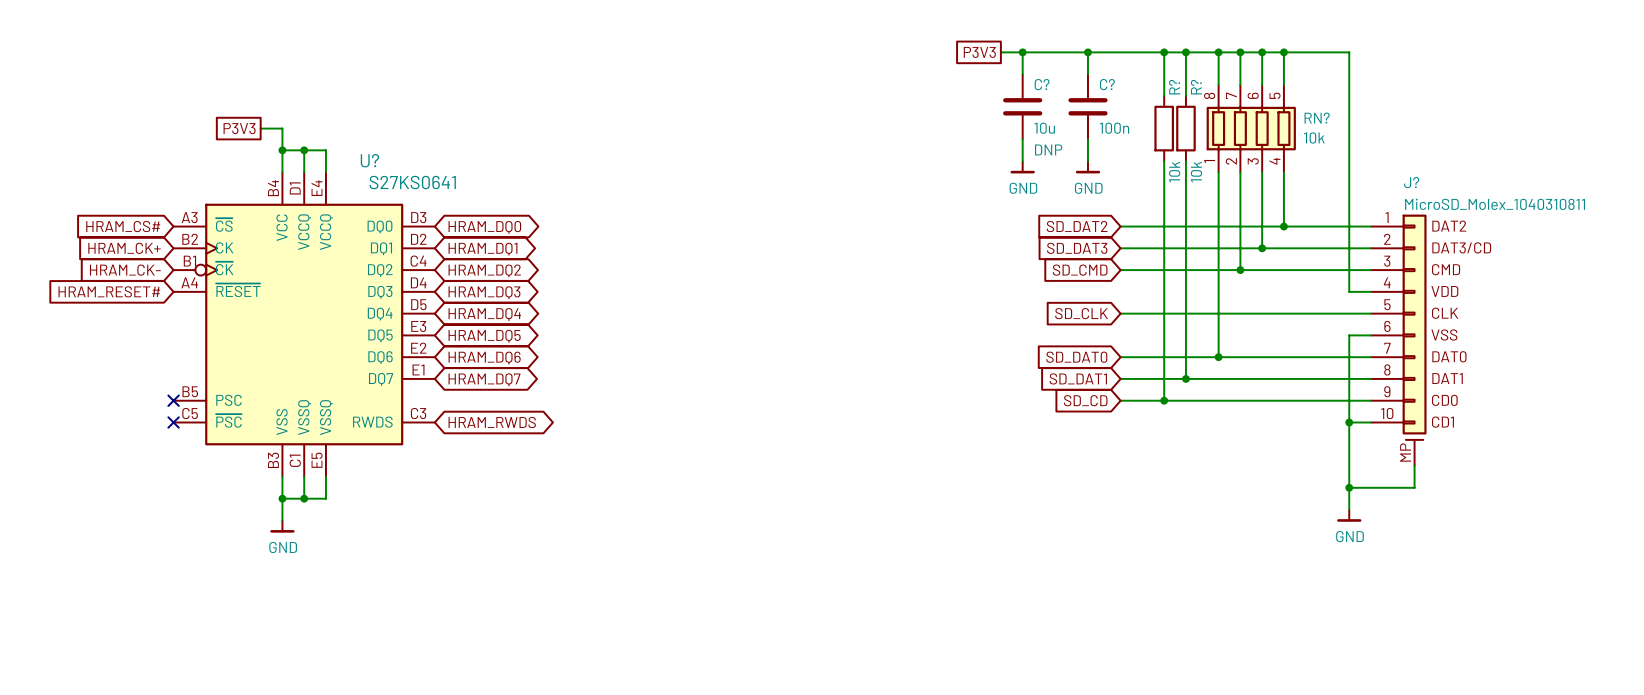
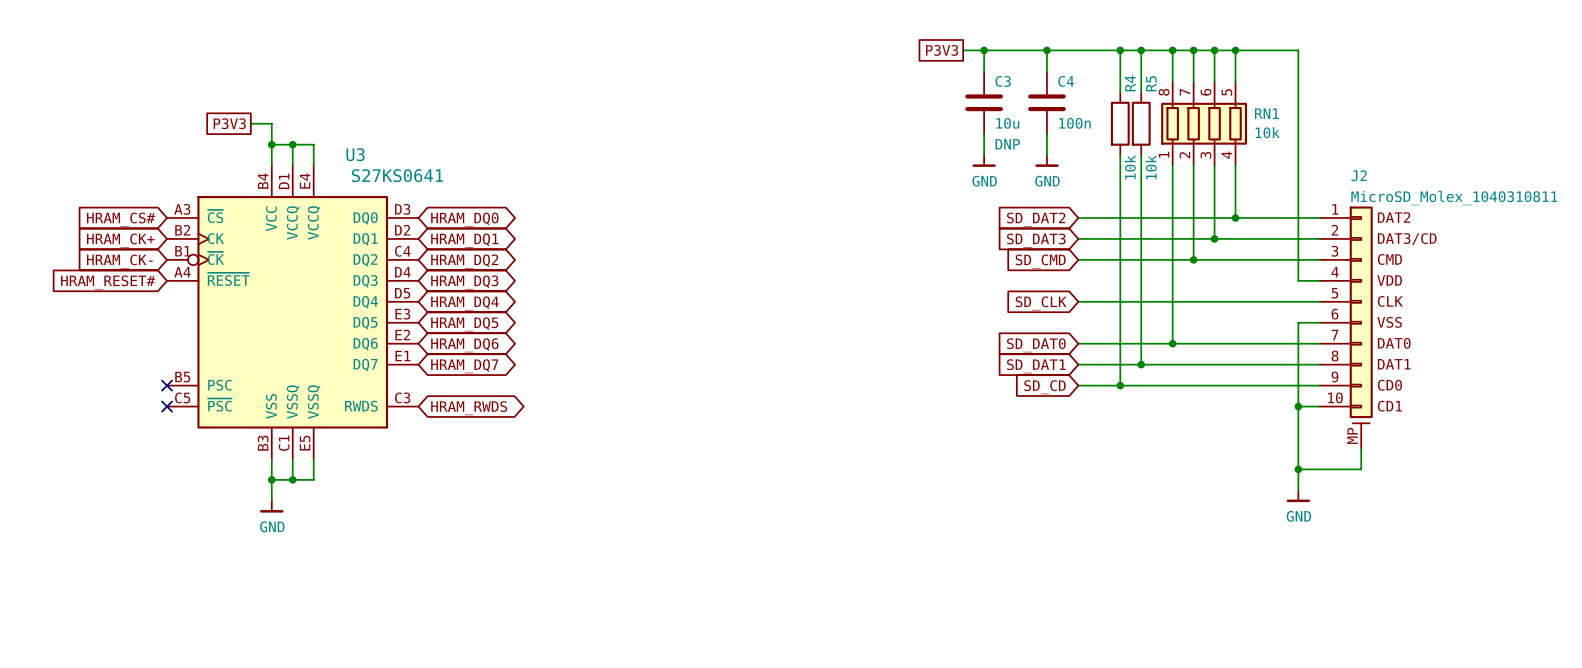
C? name: C? (1042, 84) -> C3 (1003, 81)
C? name: C? (1107, 84) -> C4 (1066, 81)
R? name: R? (1174, 87) -> R4 (1130, 83)
R? name: R? (1196, 87) -> R5 (1151, 83)
RN? name: RN? (1317, 118) -> RN1 (1266, 113)
U? name: U? (369, 160) -> U3 (355, 154)
J? name: J? (1411, 182) -> J2 (1359, 175)

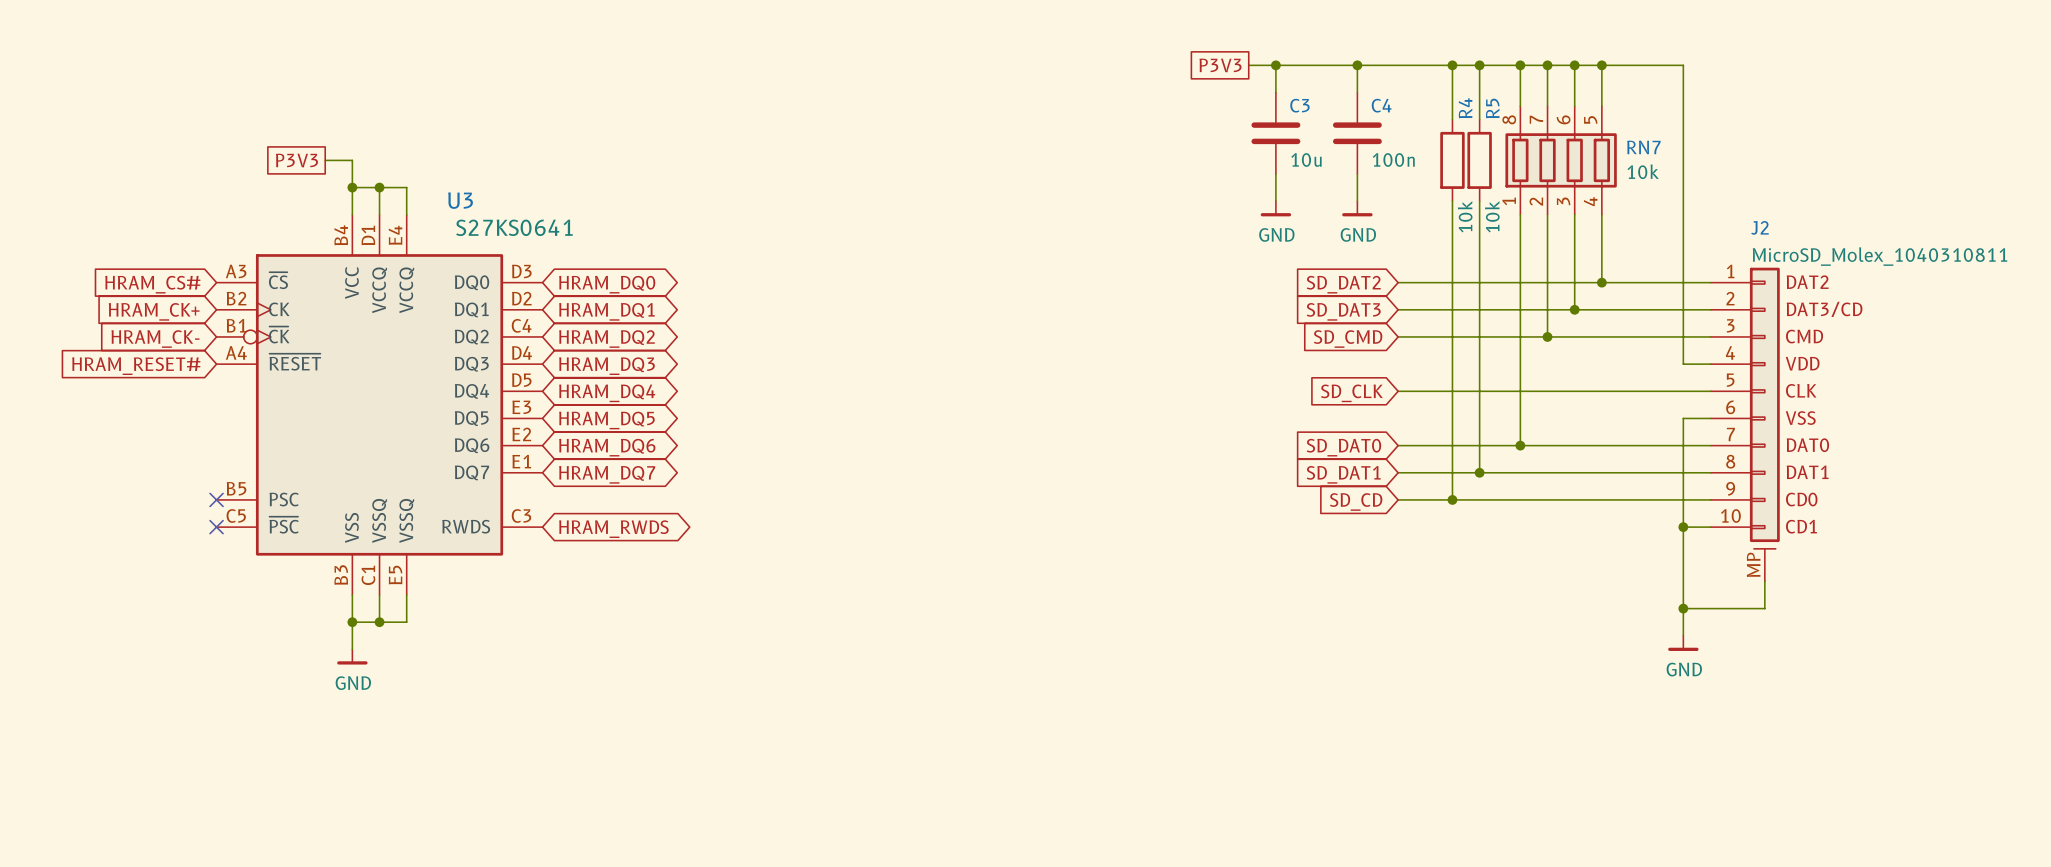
RN1 name: RN1 (1266, 113) -> RN7 (1643, 147)
C3 text: DNP (1007, 144) -> none

